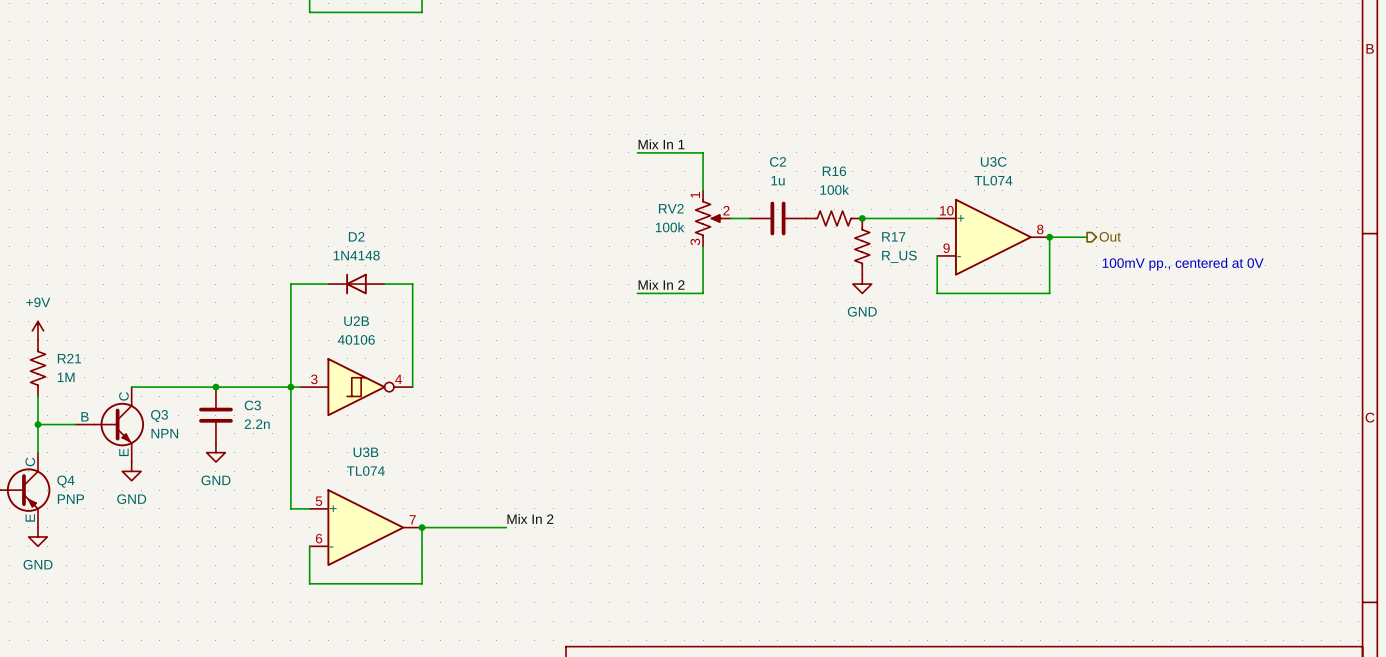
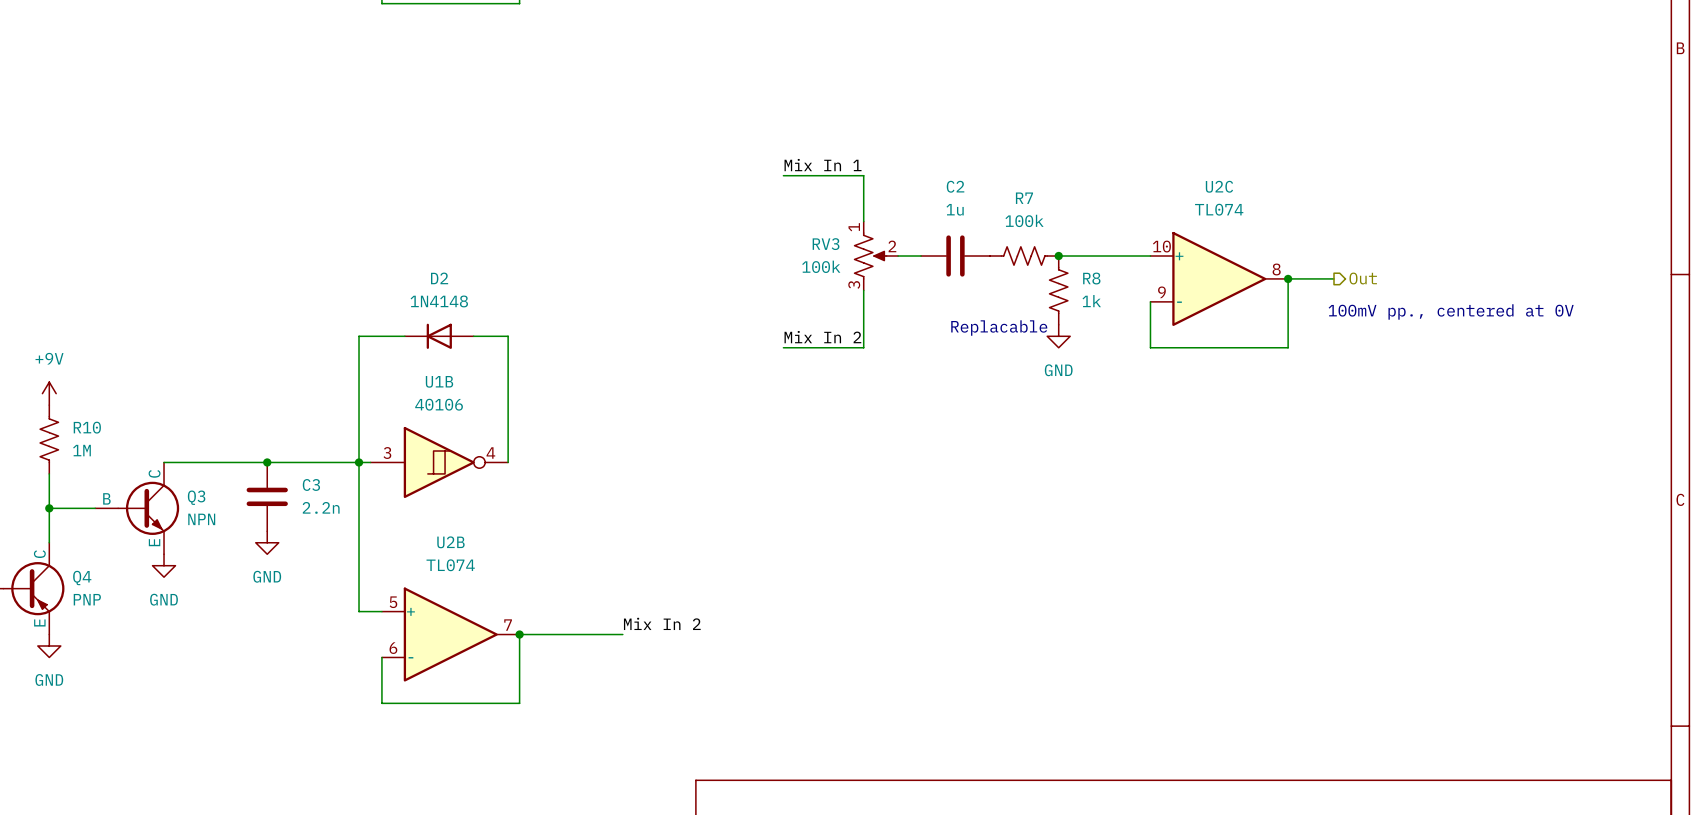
U3C name: U3C (993, 161) -> U2C (1219, 186)
R16 name: R16 (834, 171) -> R7 (1024, 198)
RV2 name: RV2 (671, 208) -> RV3 (826, 244)
R17 name: R17 (893, 236) -> R8 (1091, 278)
R17 value: R_US (899, 256) -> 1k (1091, 301)
text: none -> Replacable (999, 328)
U2B name: U2B (356, 321) -> U1B (439, 381)
R21 name: R21 (69, 358) -> R10 (87, 427)
U3B name: U3B (366, 452) -> U2B (450, 542)

